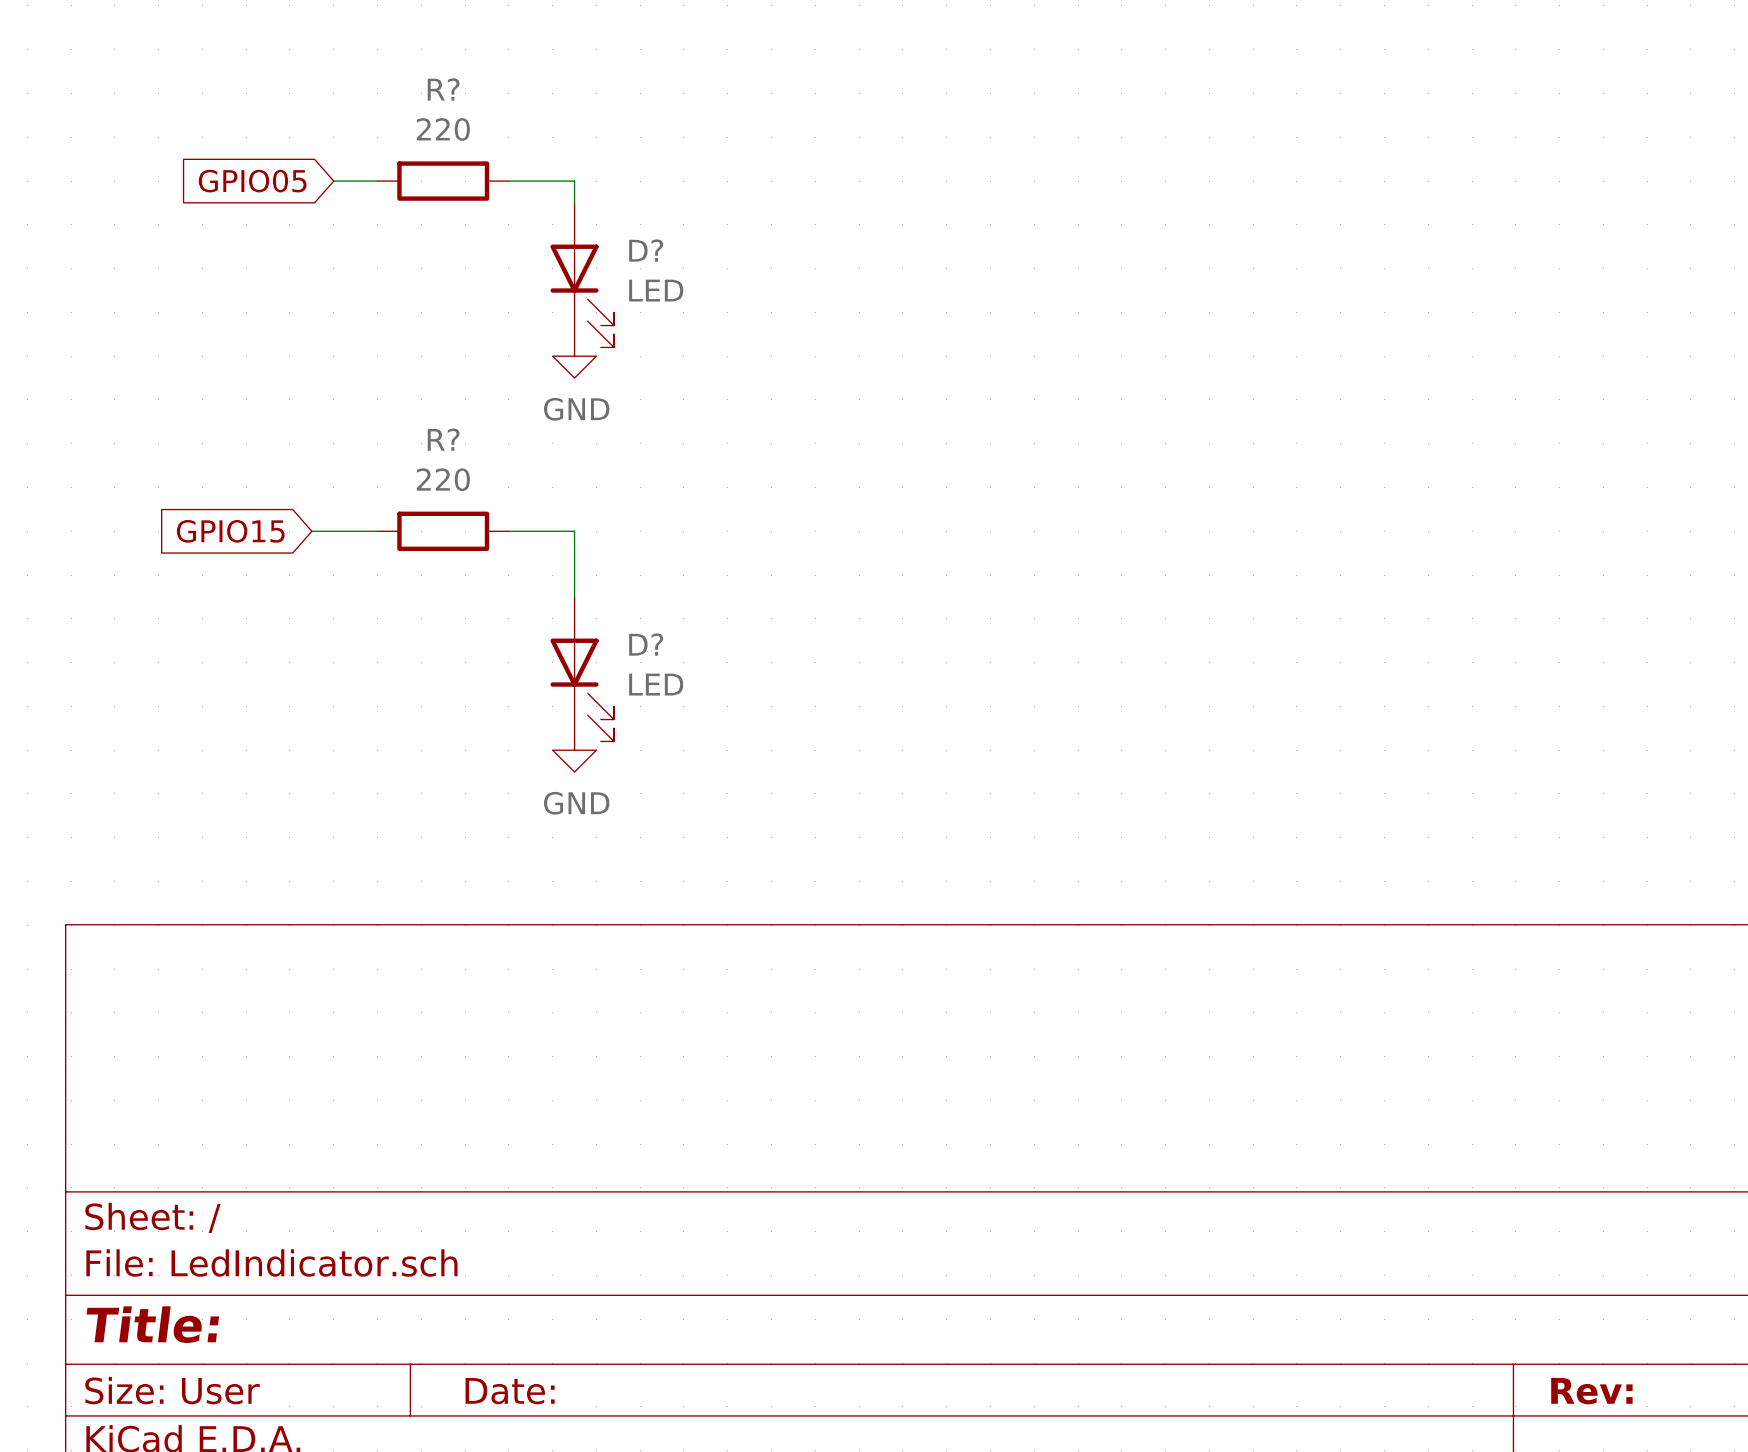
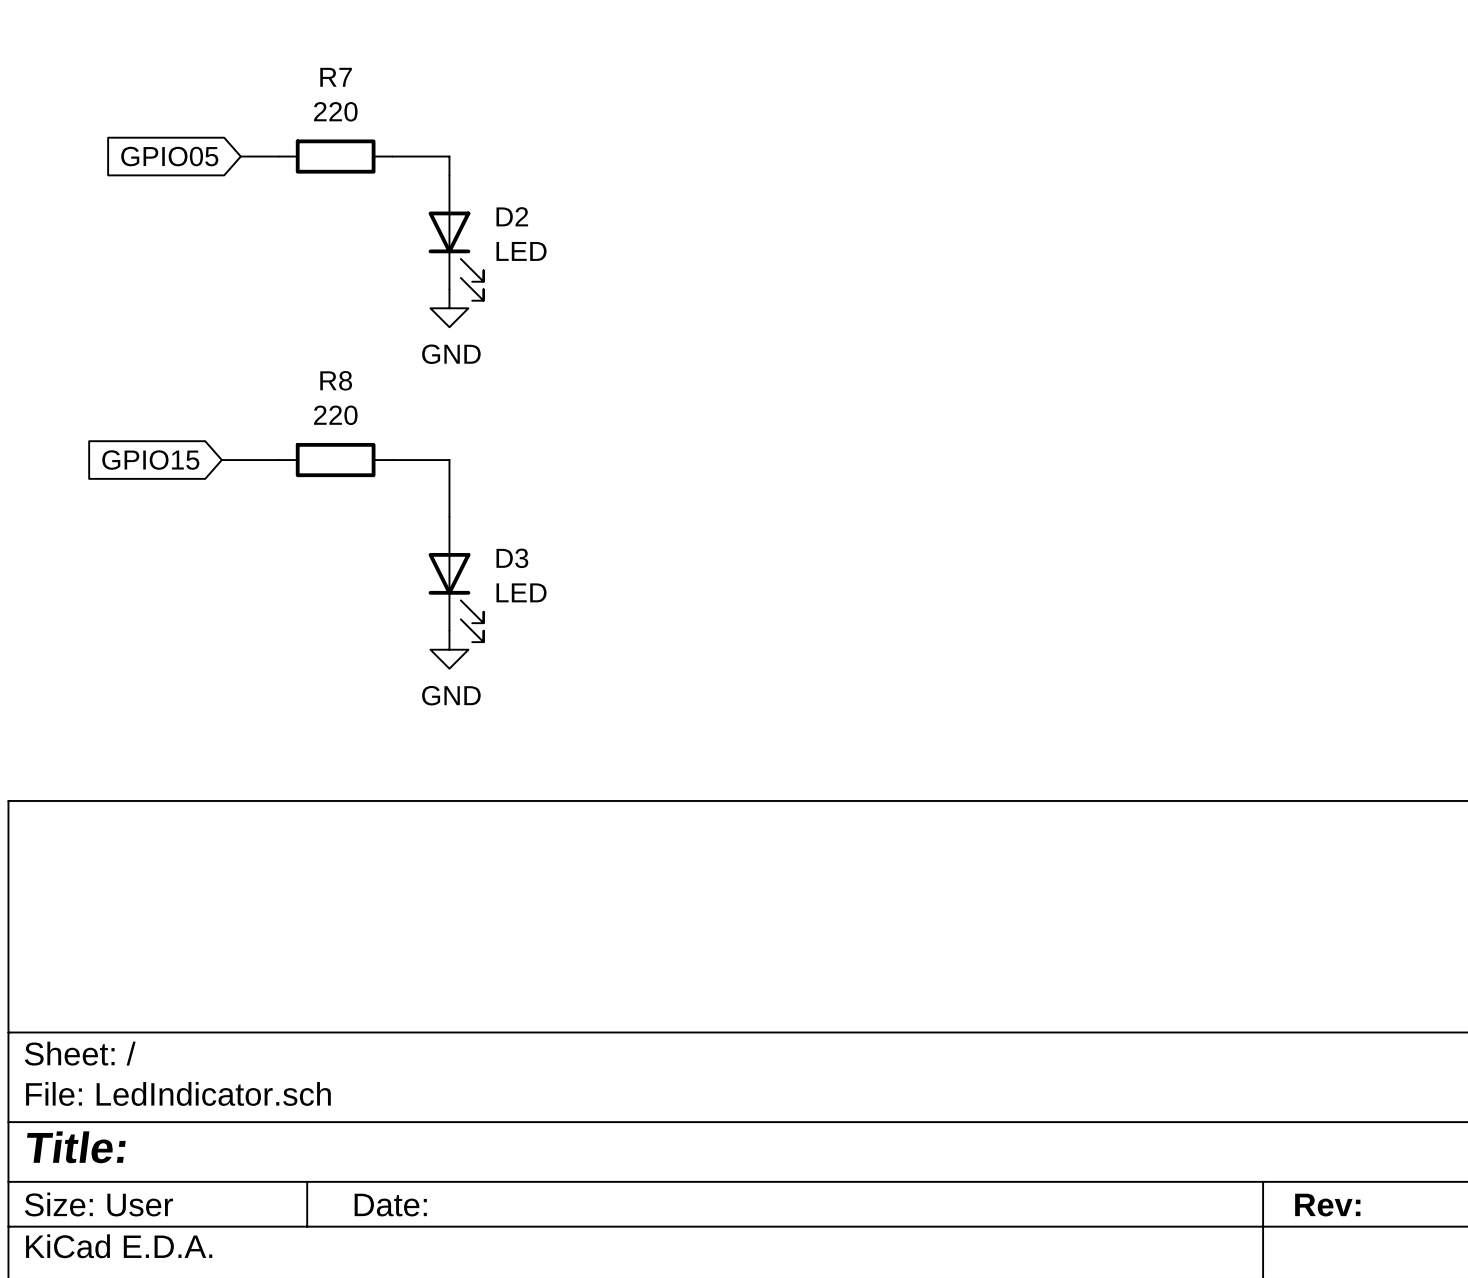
R? name: R? (443, 89) -> R7 (336, 77)
D? name: D? (646, 250) -> D2 (512, 216)
R? name: R? (443, 439) -> R8 (336, 380)
D? name: D? (646, 644) -> D3 (512, 558)

